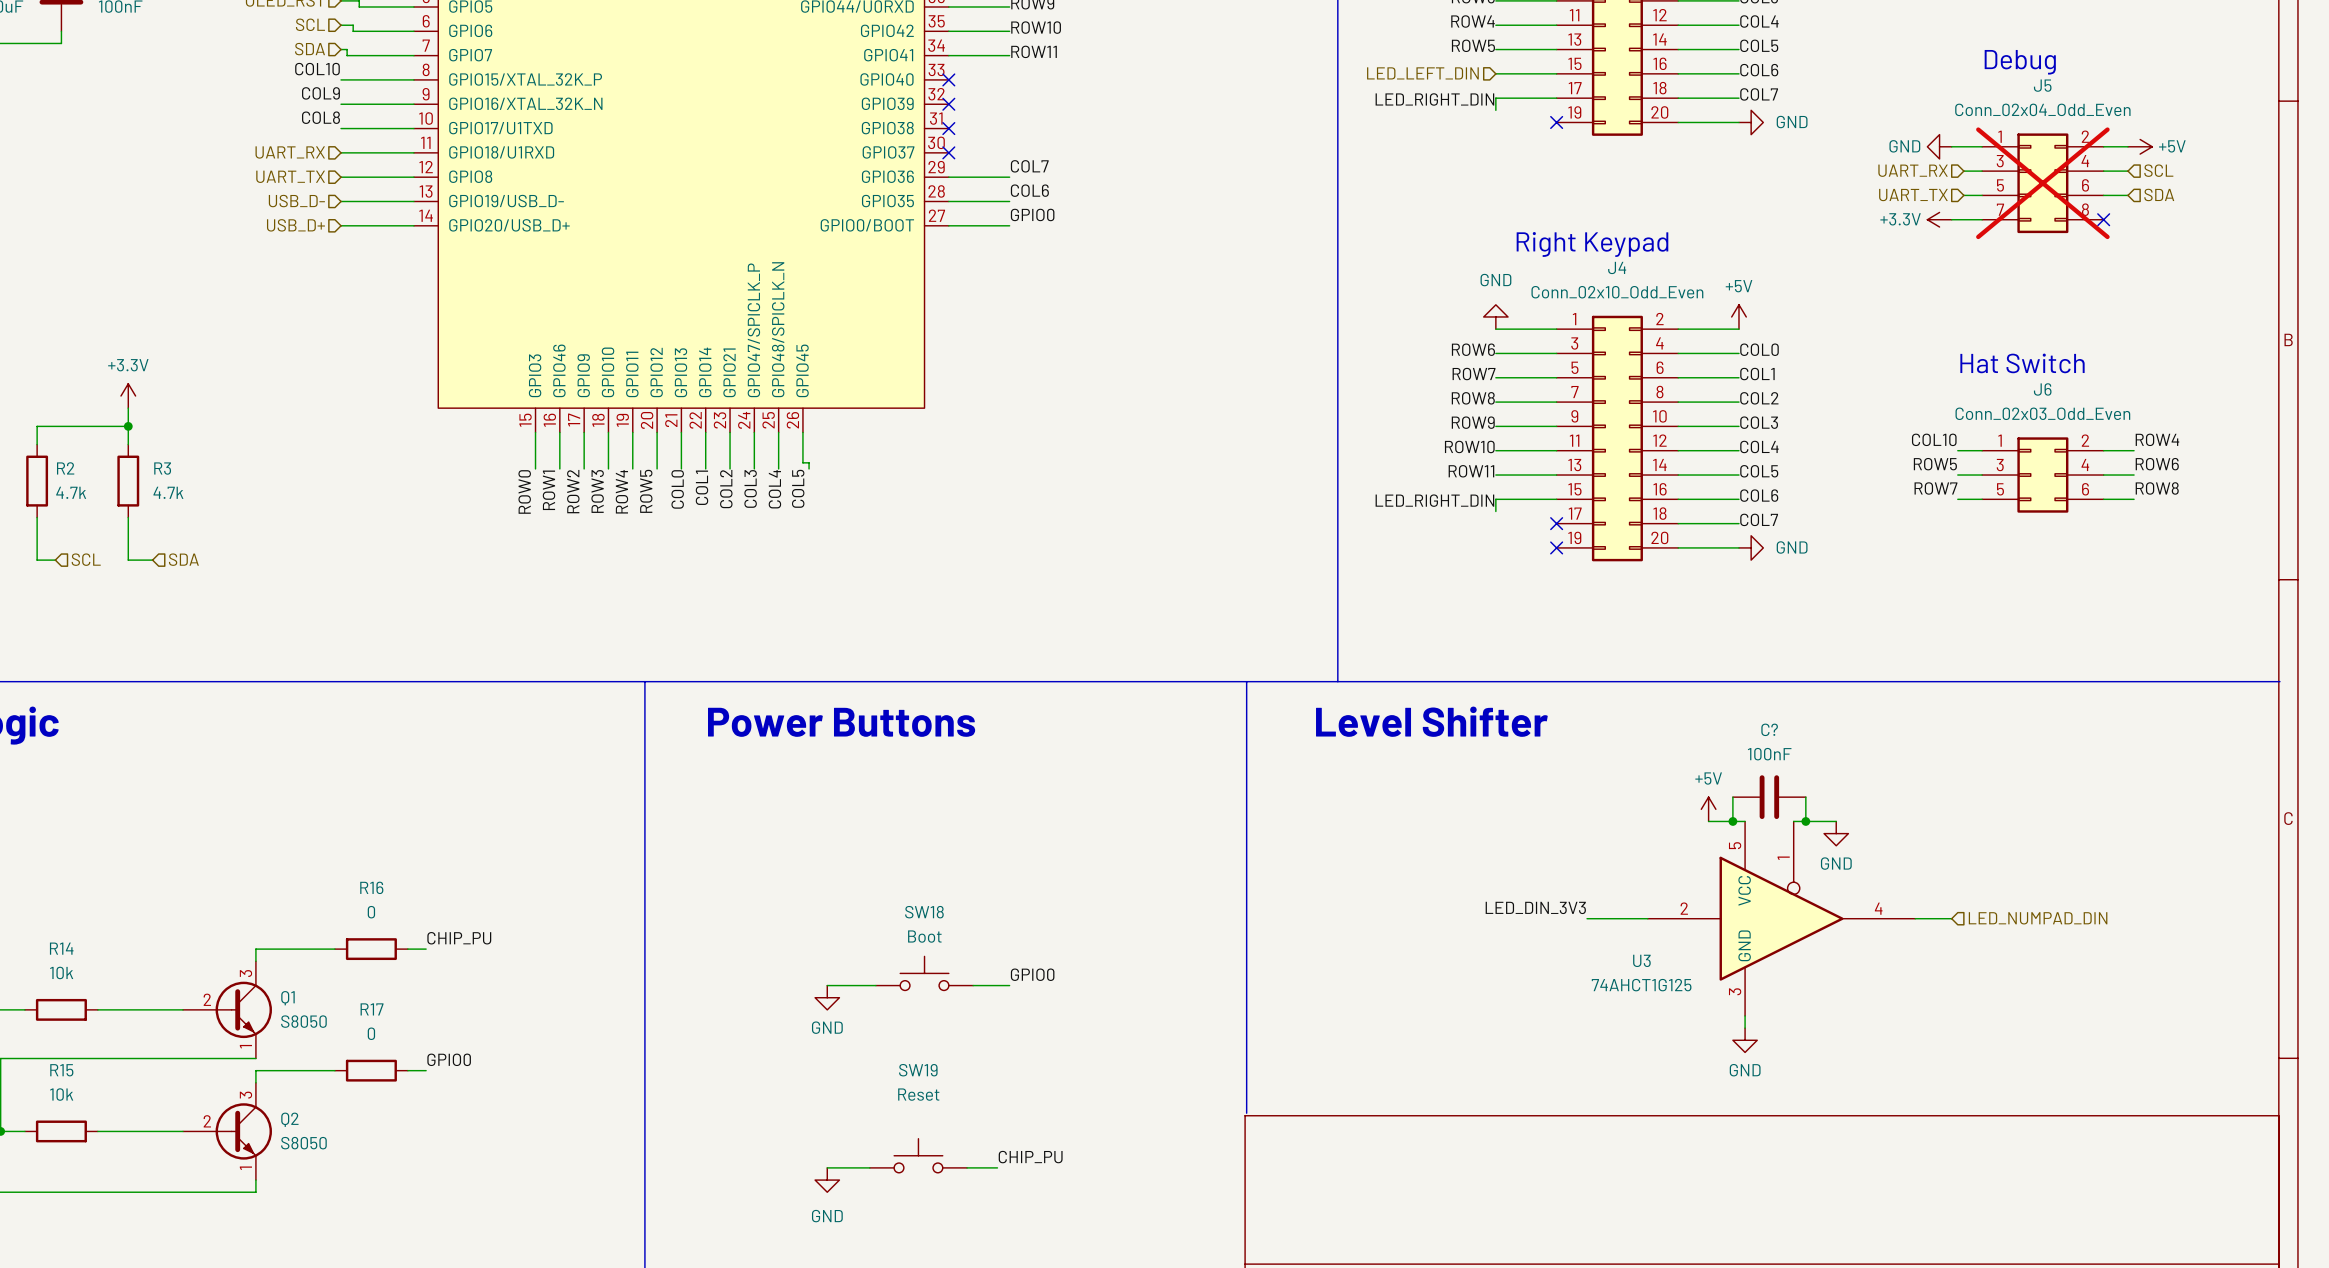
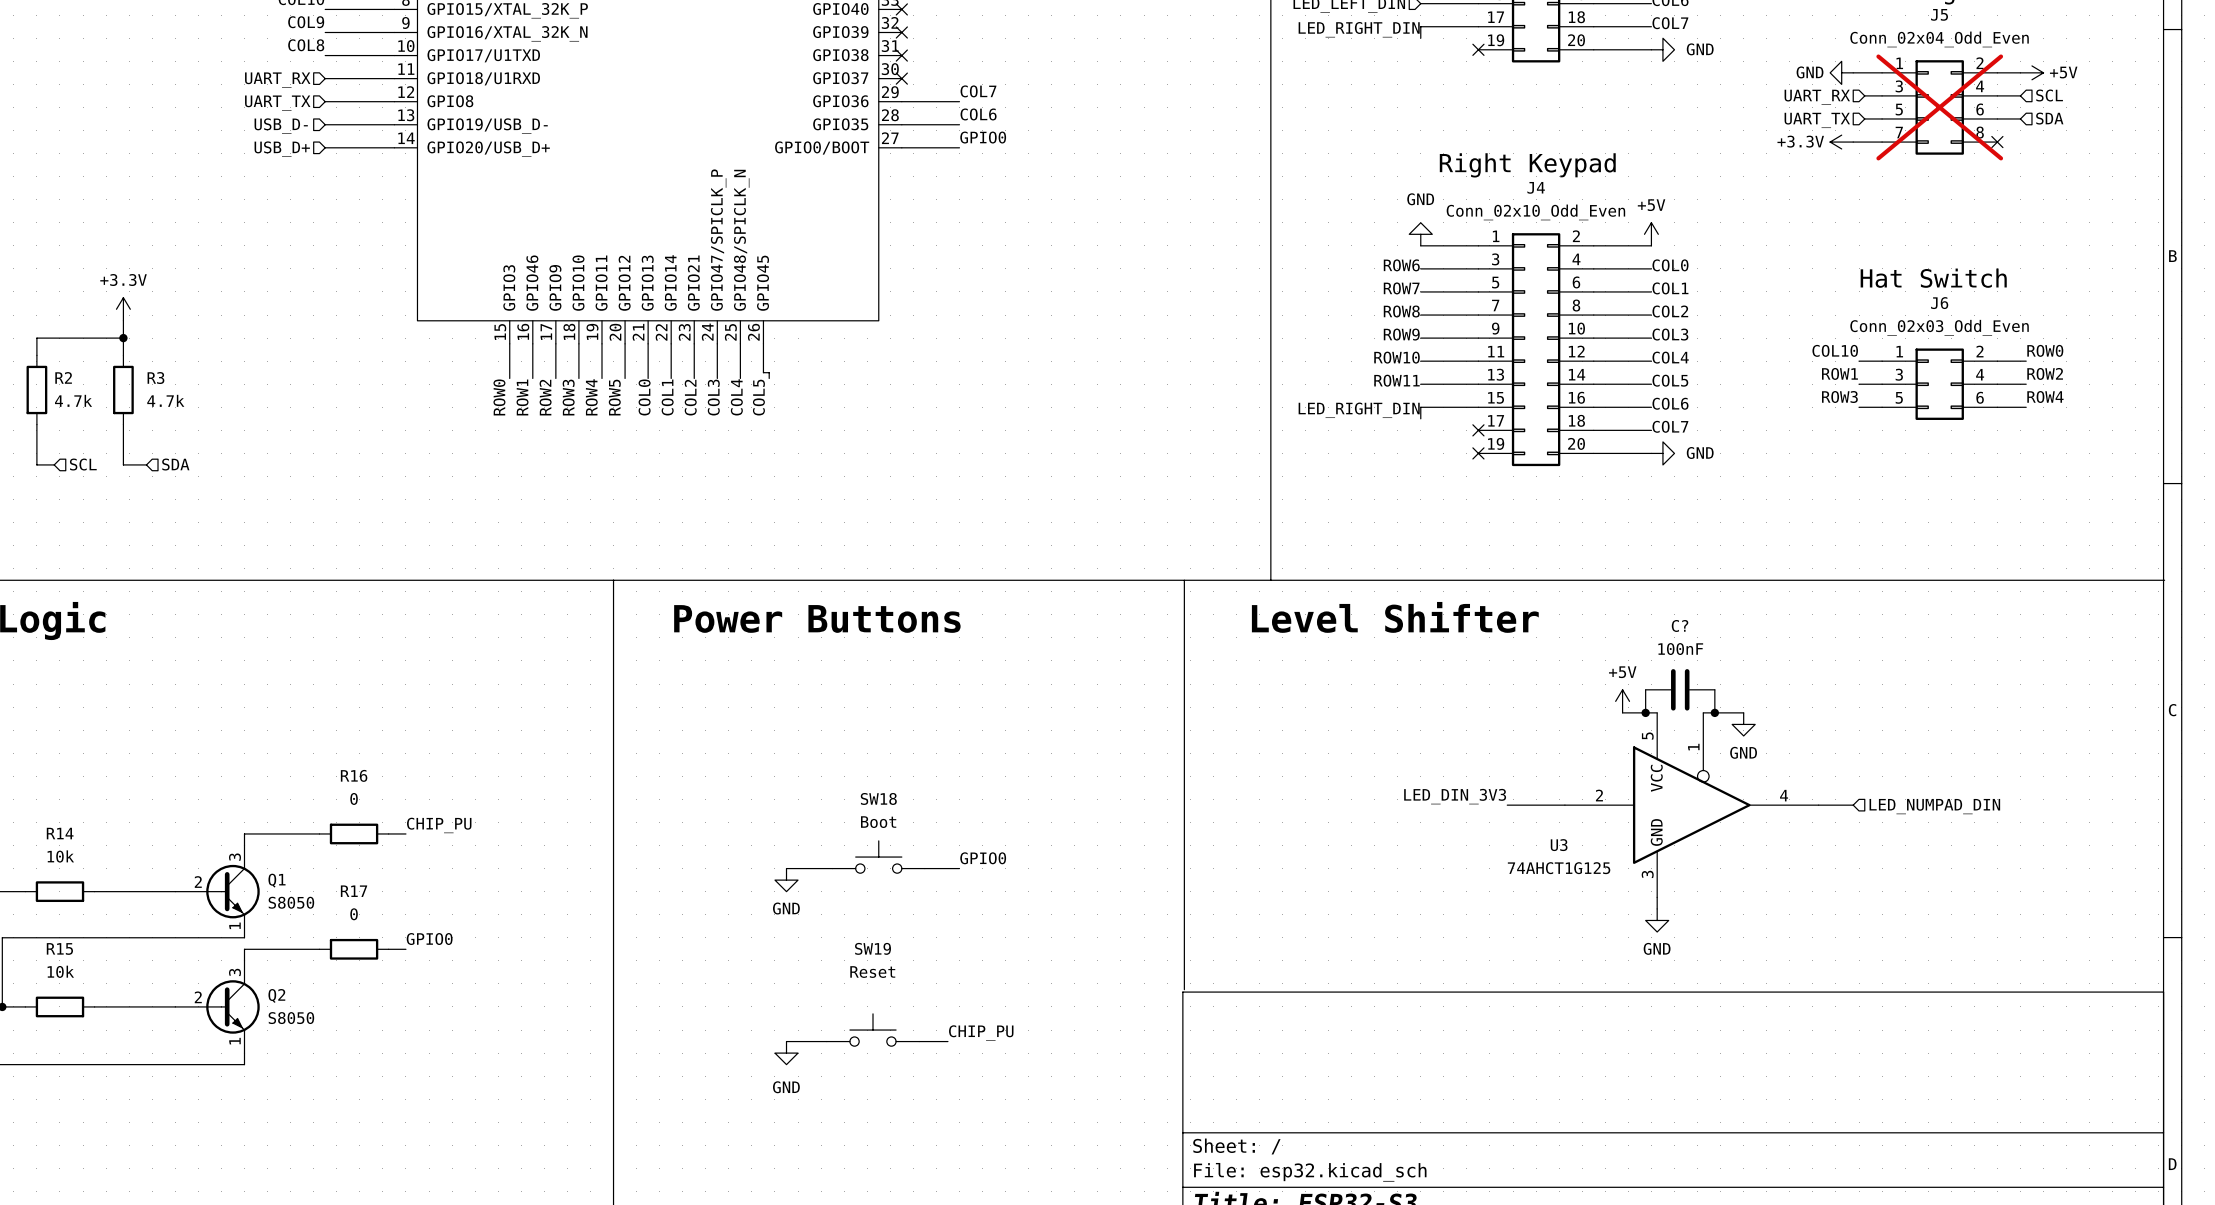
label: ROW4 (2157, 439) -> ROW0 (2045, 350)
label: ROW5 (1935, 464) -> ROW1 (1839, 373)
label: ROW6 (2157, 464) -> ROW2 (2045, 373)
label: ROW7 (1935, 488) -> ROW3 (1839, 397)
label: ROW8 (2157, 488) -> ROW4 (2045, 397)

